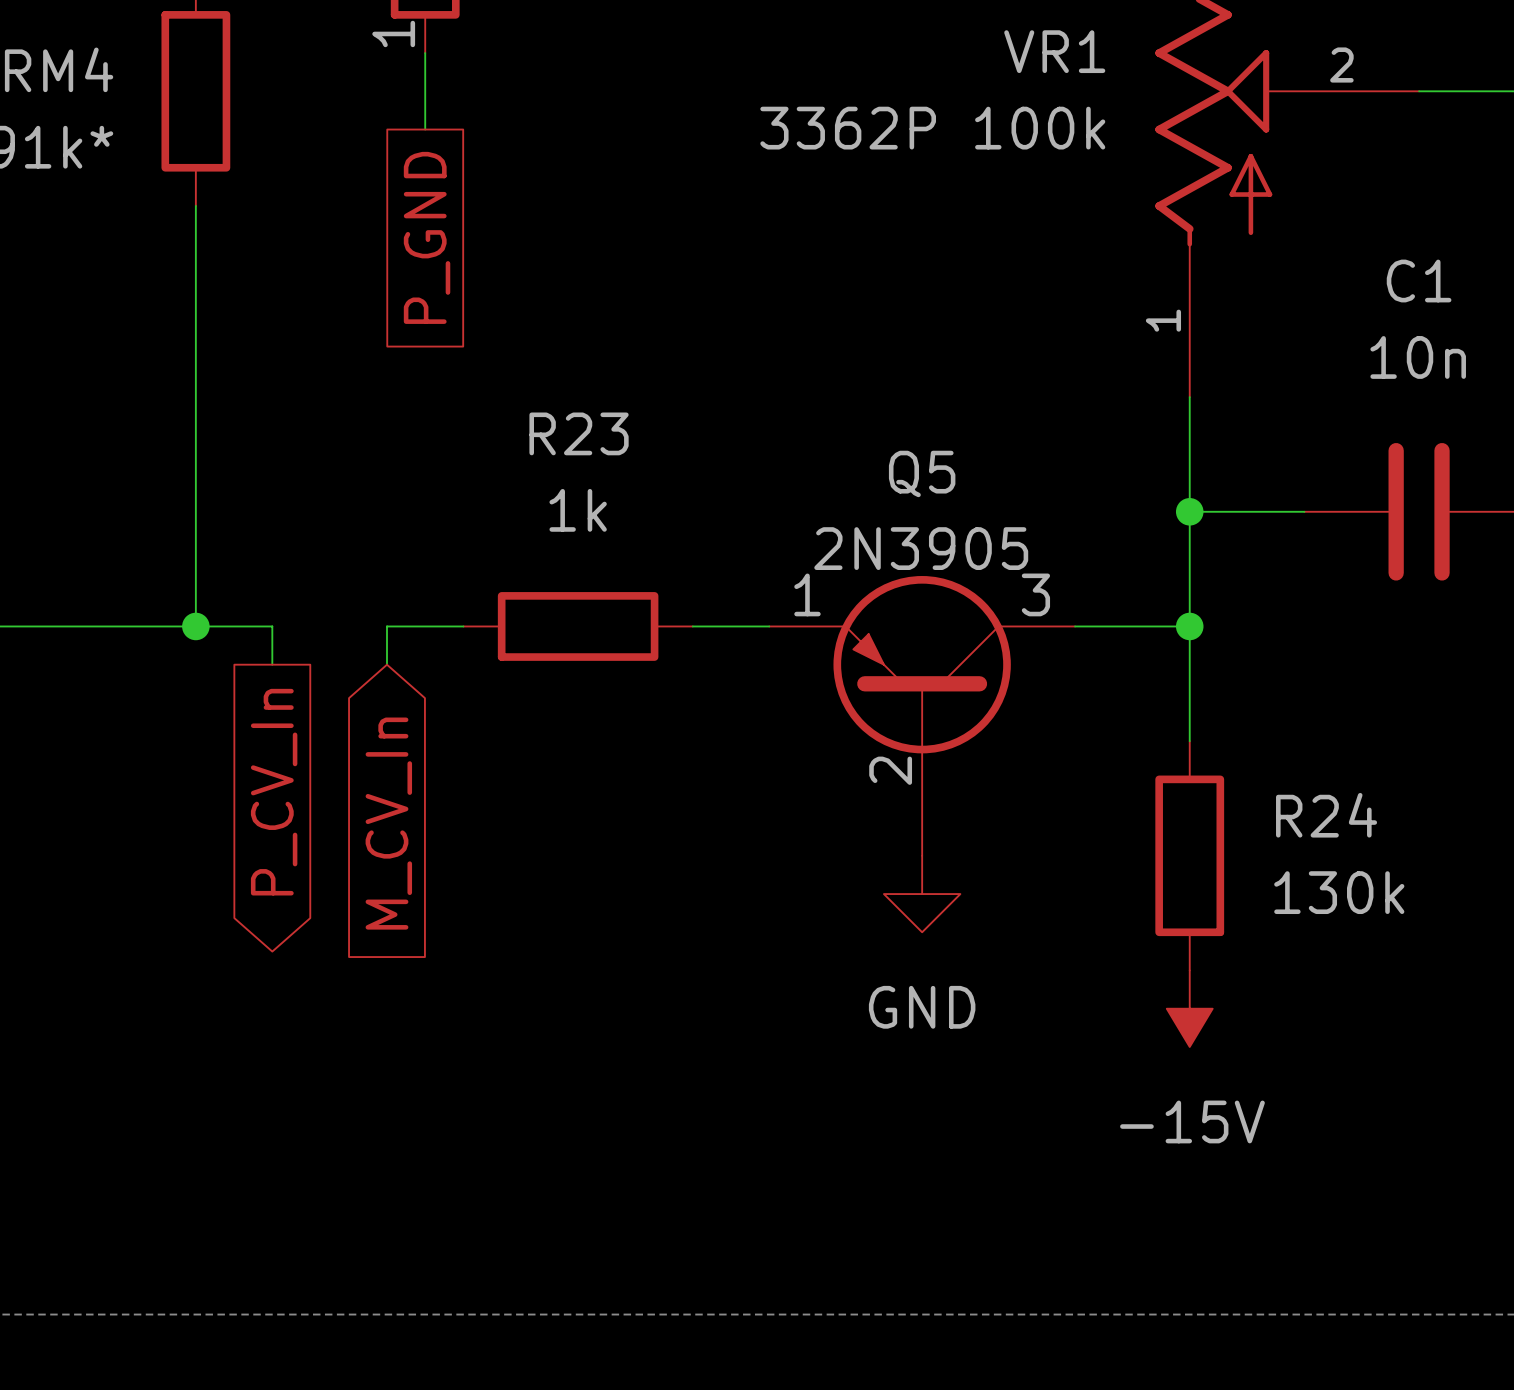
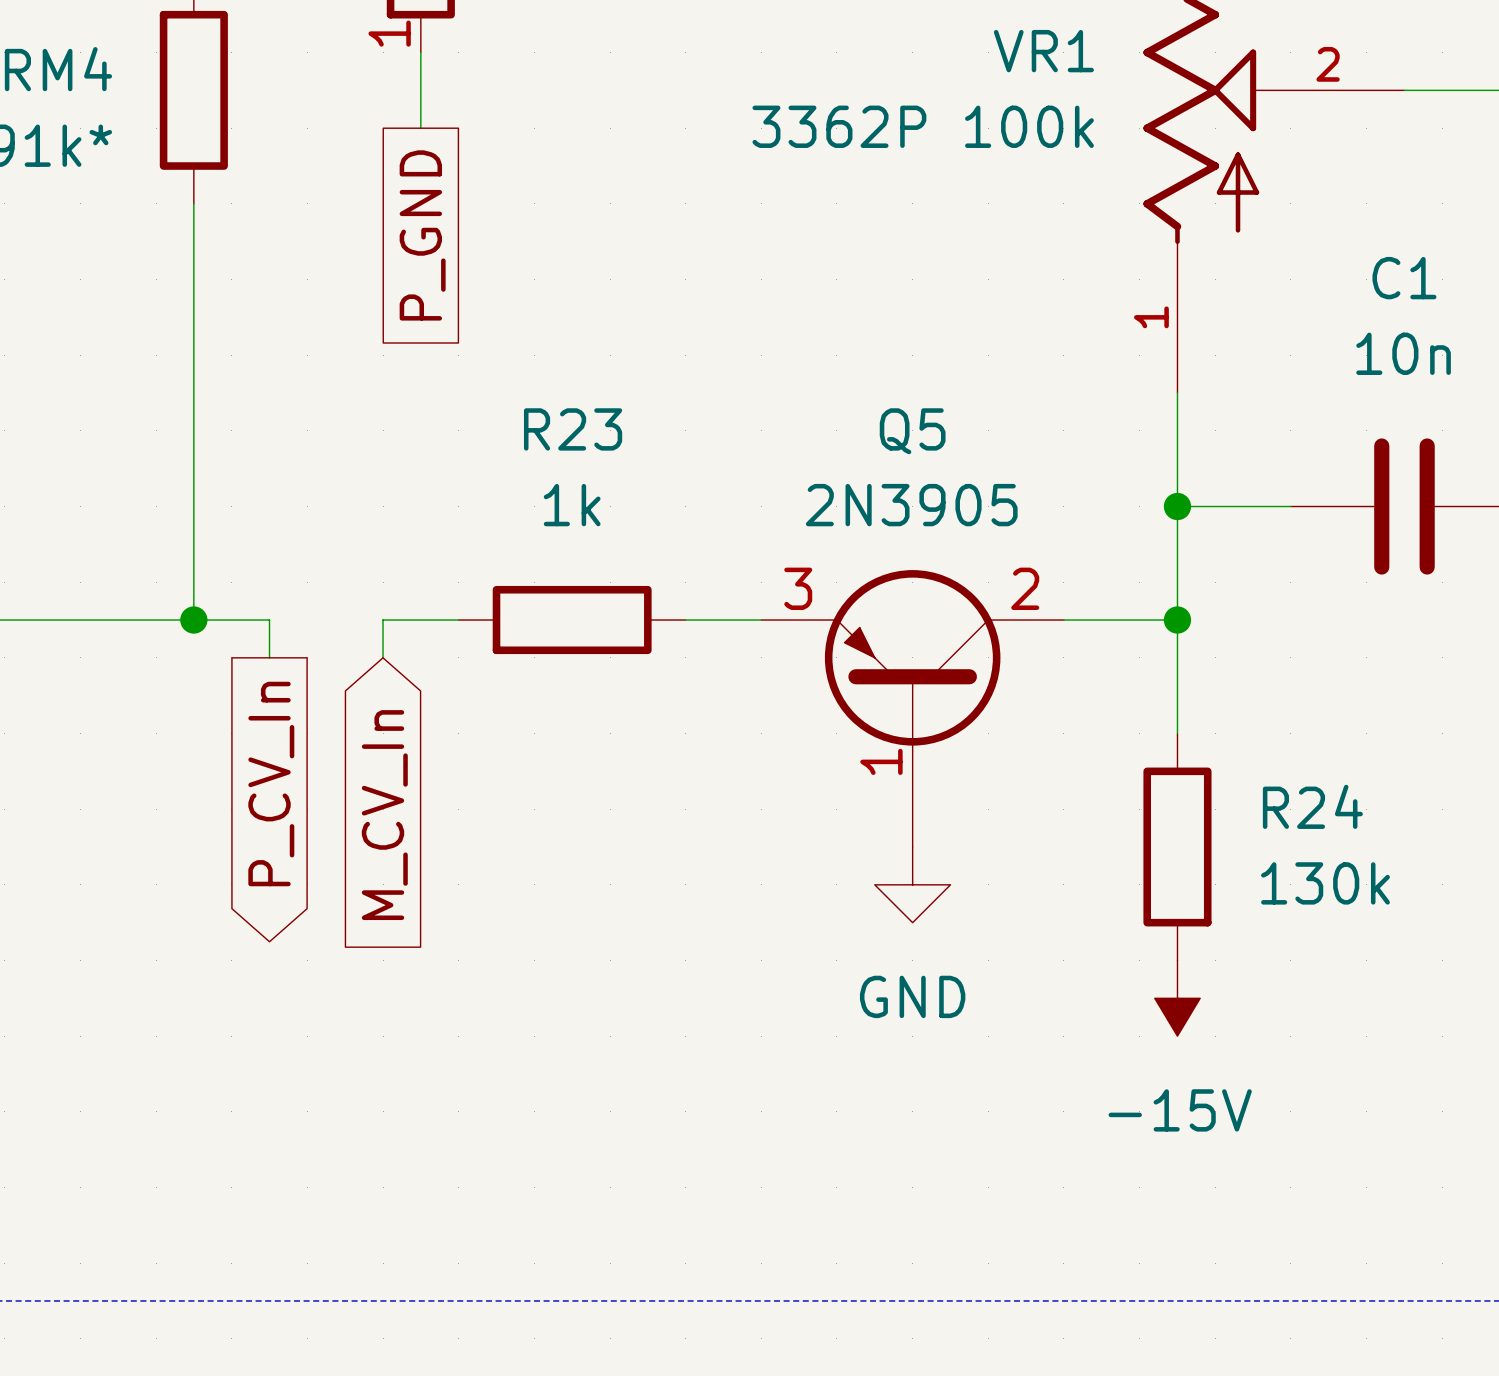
Q5 name position: Q5 (922, 473) -> Q5 (912, 431)
Q5 value position: 2N3905 (921, 548) -> 2N3905 (911, 505)
Q5 pin number: 1 (807, 594) -> 3 (798, 588)
Q5 pin number: 3 (1035, 594) -> 2 (1025, 588)
Q5 pin number: 2 (890, 770) -> 1 (881, 761)

